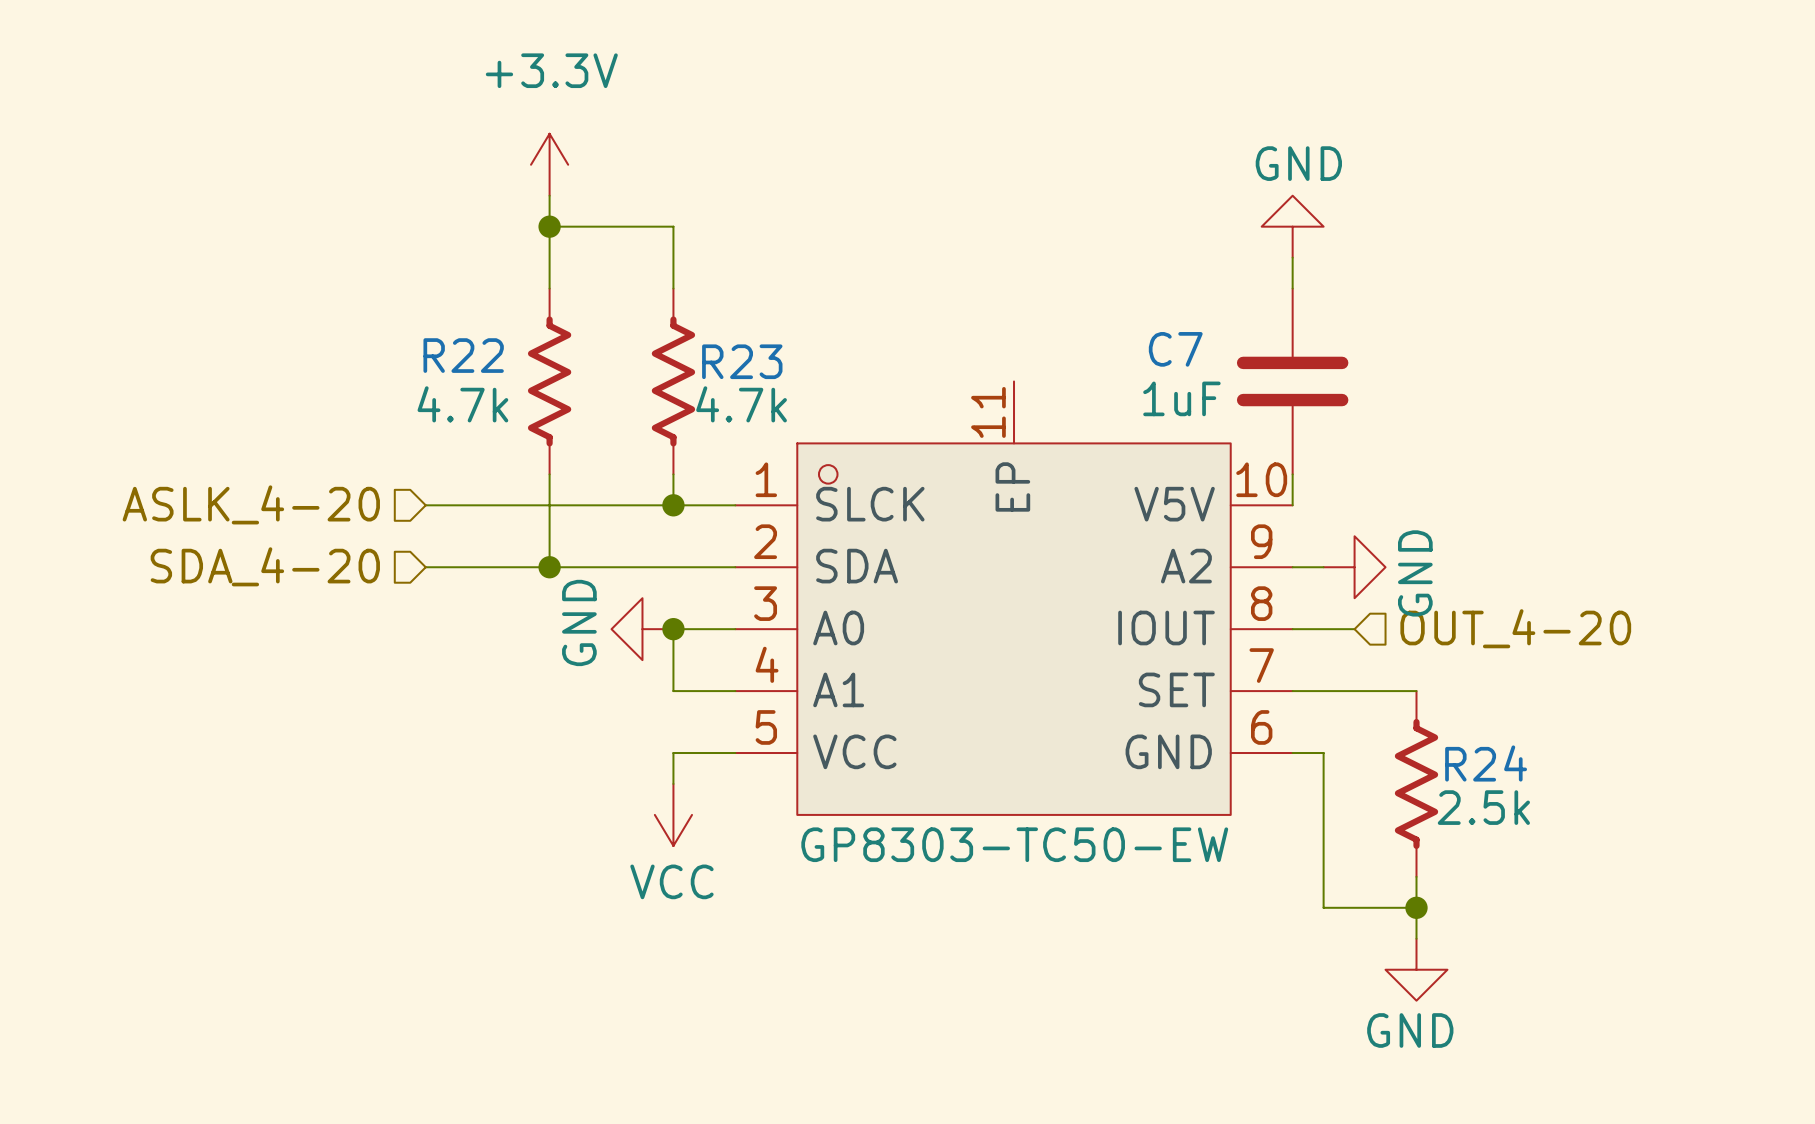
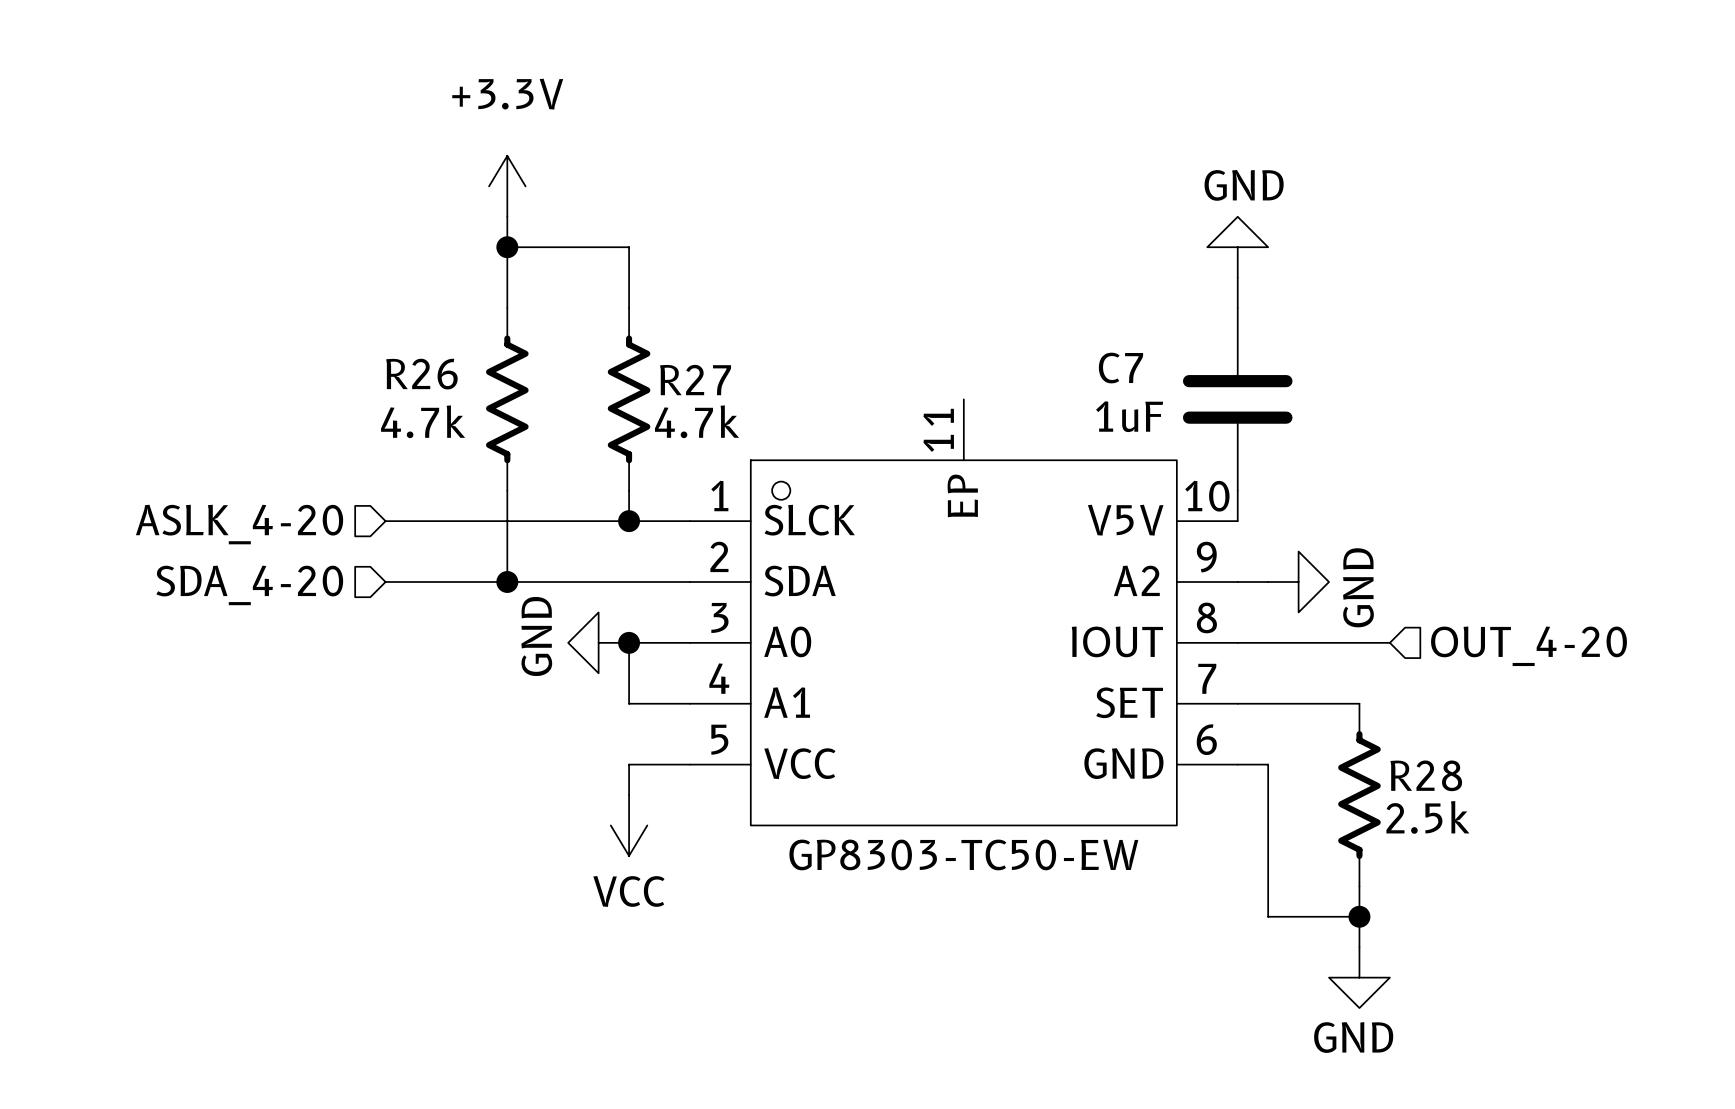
R22 name: R22 (463, 355) -> R26 (421, 374)
R23 name: R23 (742, 361) -> R27 (695, 380)
hierarchical label position: OUT_4-20 (1515, 628) -> OUT_4-20 (1528, 646)
wire: none -> (1298, 642) (1389, 642)
R24 name: R24 (1486, 763) -> R28 (1426, 775)

